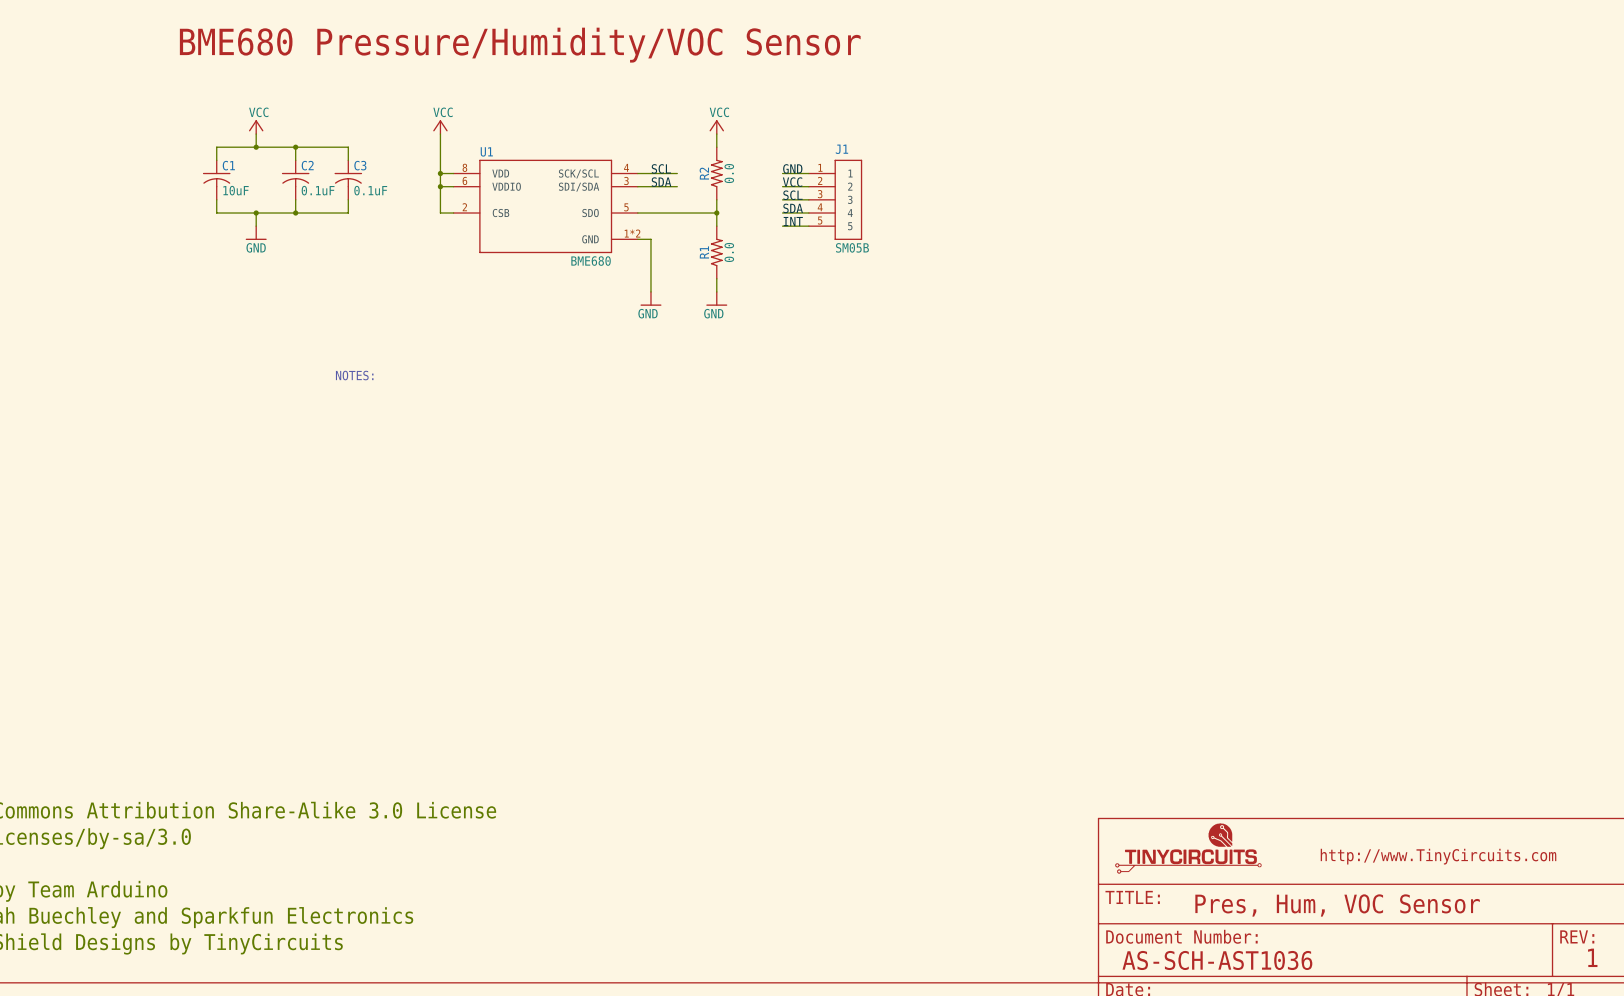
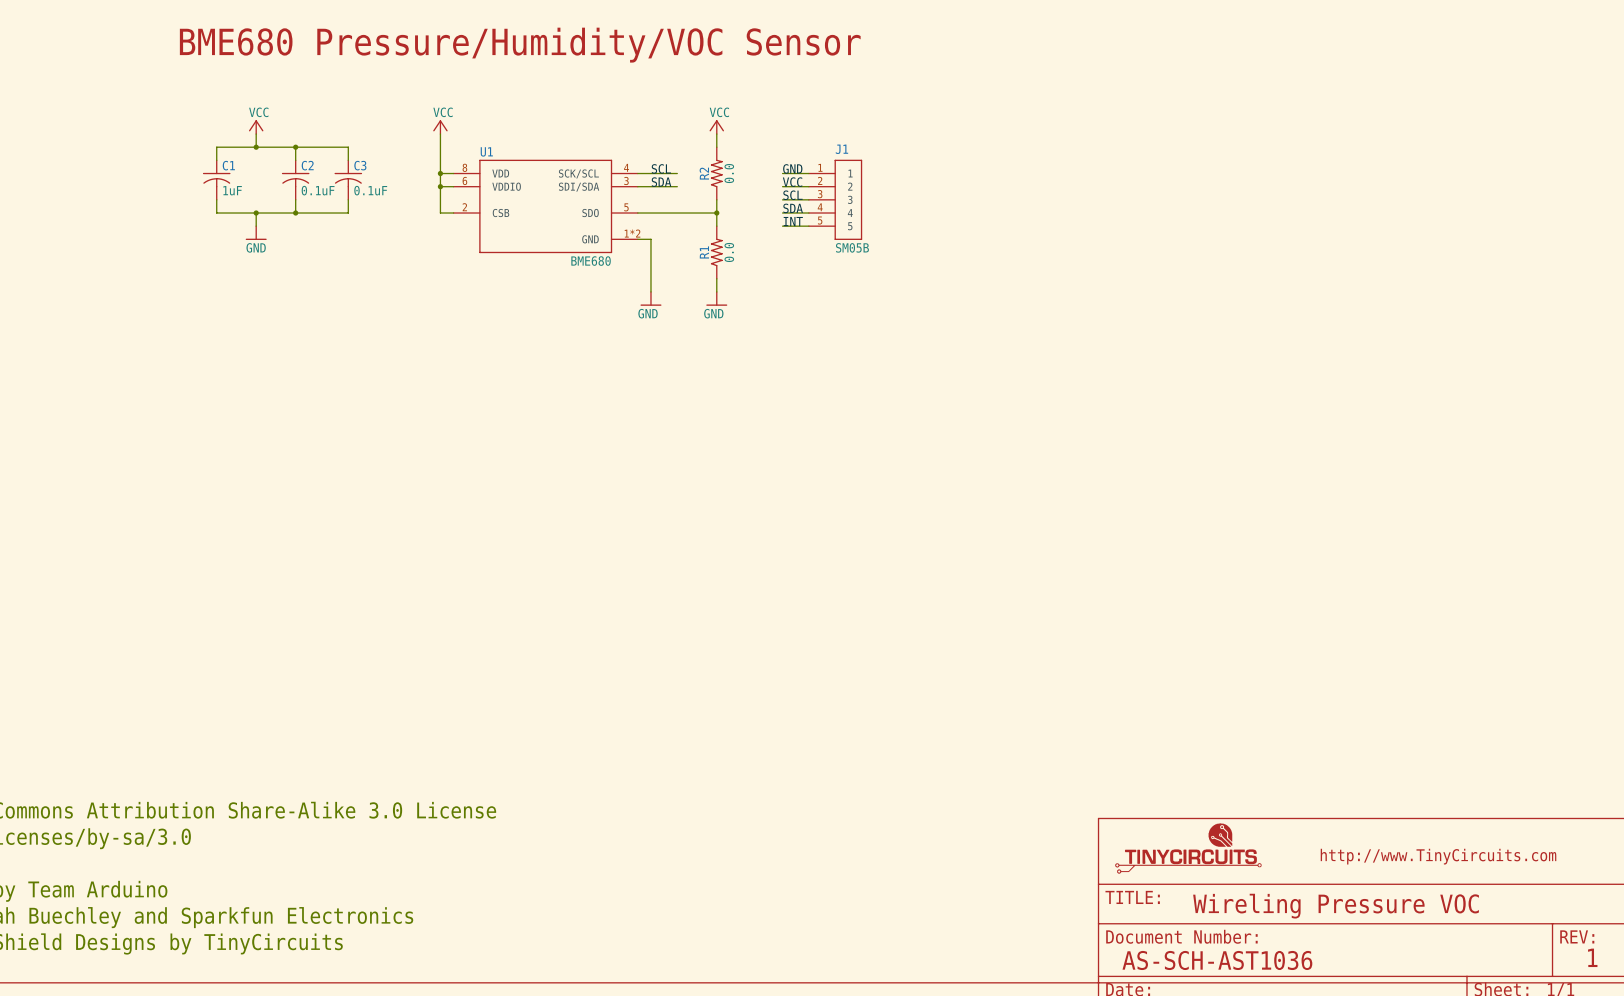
C1 value: 10uF (236, 190) -> 1uF (232, 190)
text: NOTES: (354, 375) -> none
text: Pres, Hum, VOC Sensor (1337, 905) -> Wireling Pressure VOC (1336, 906)

